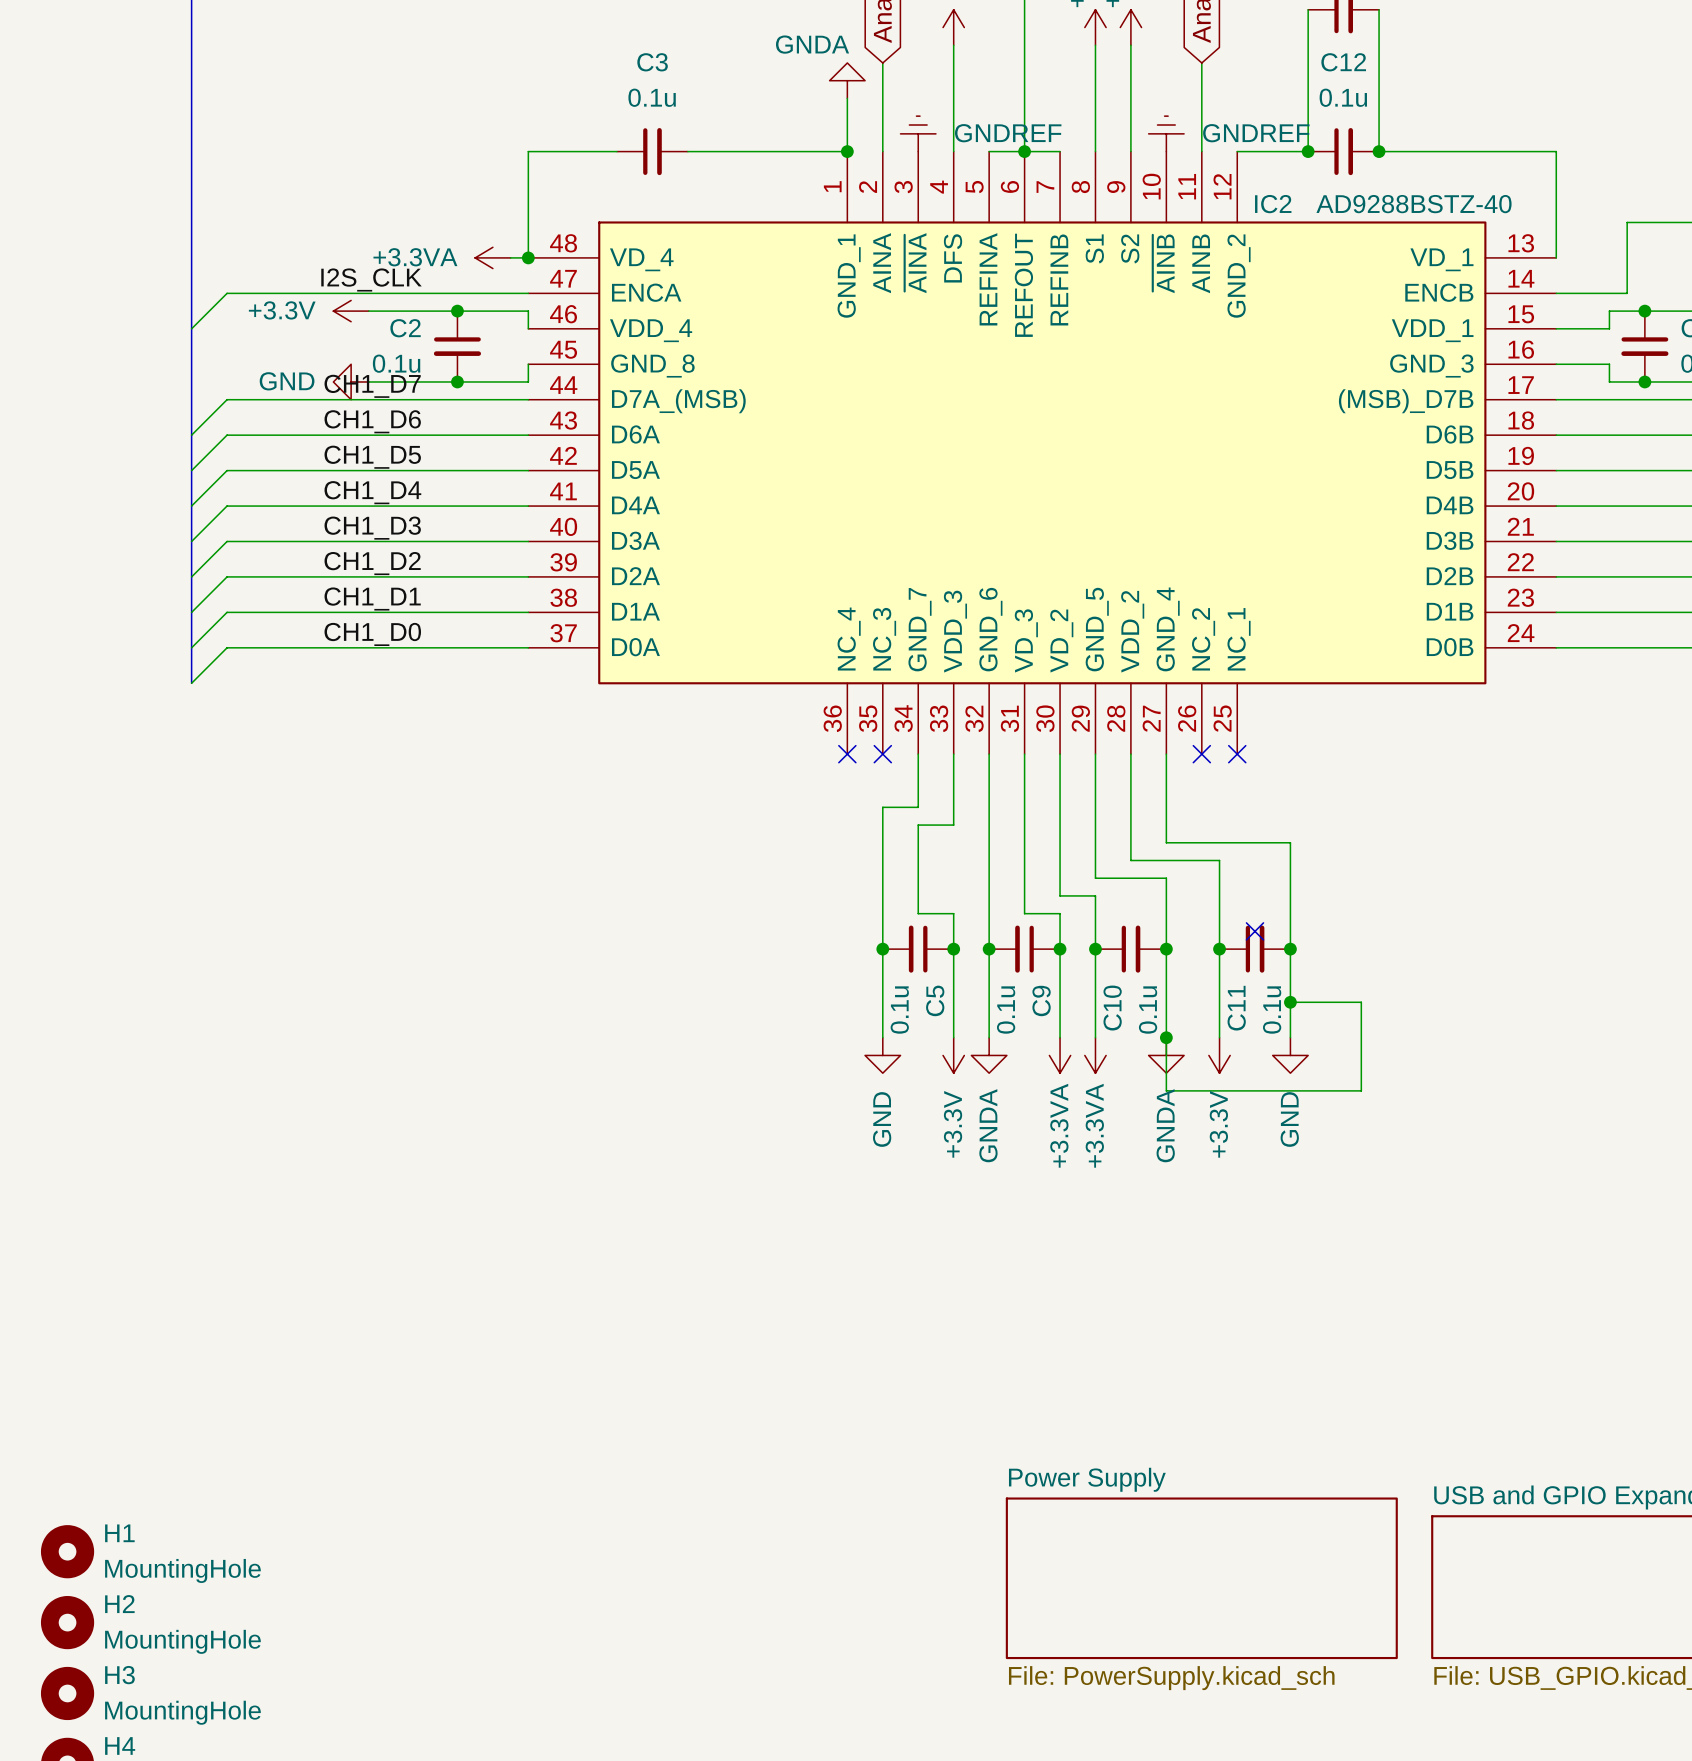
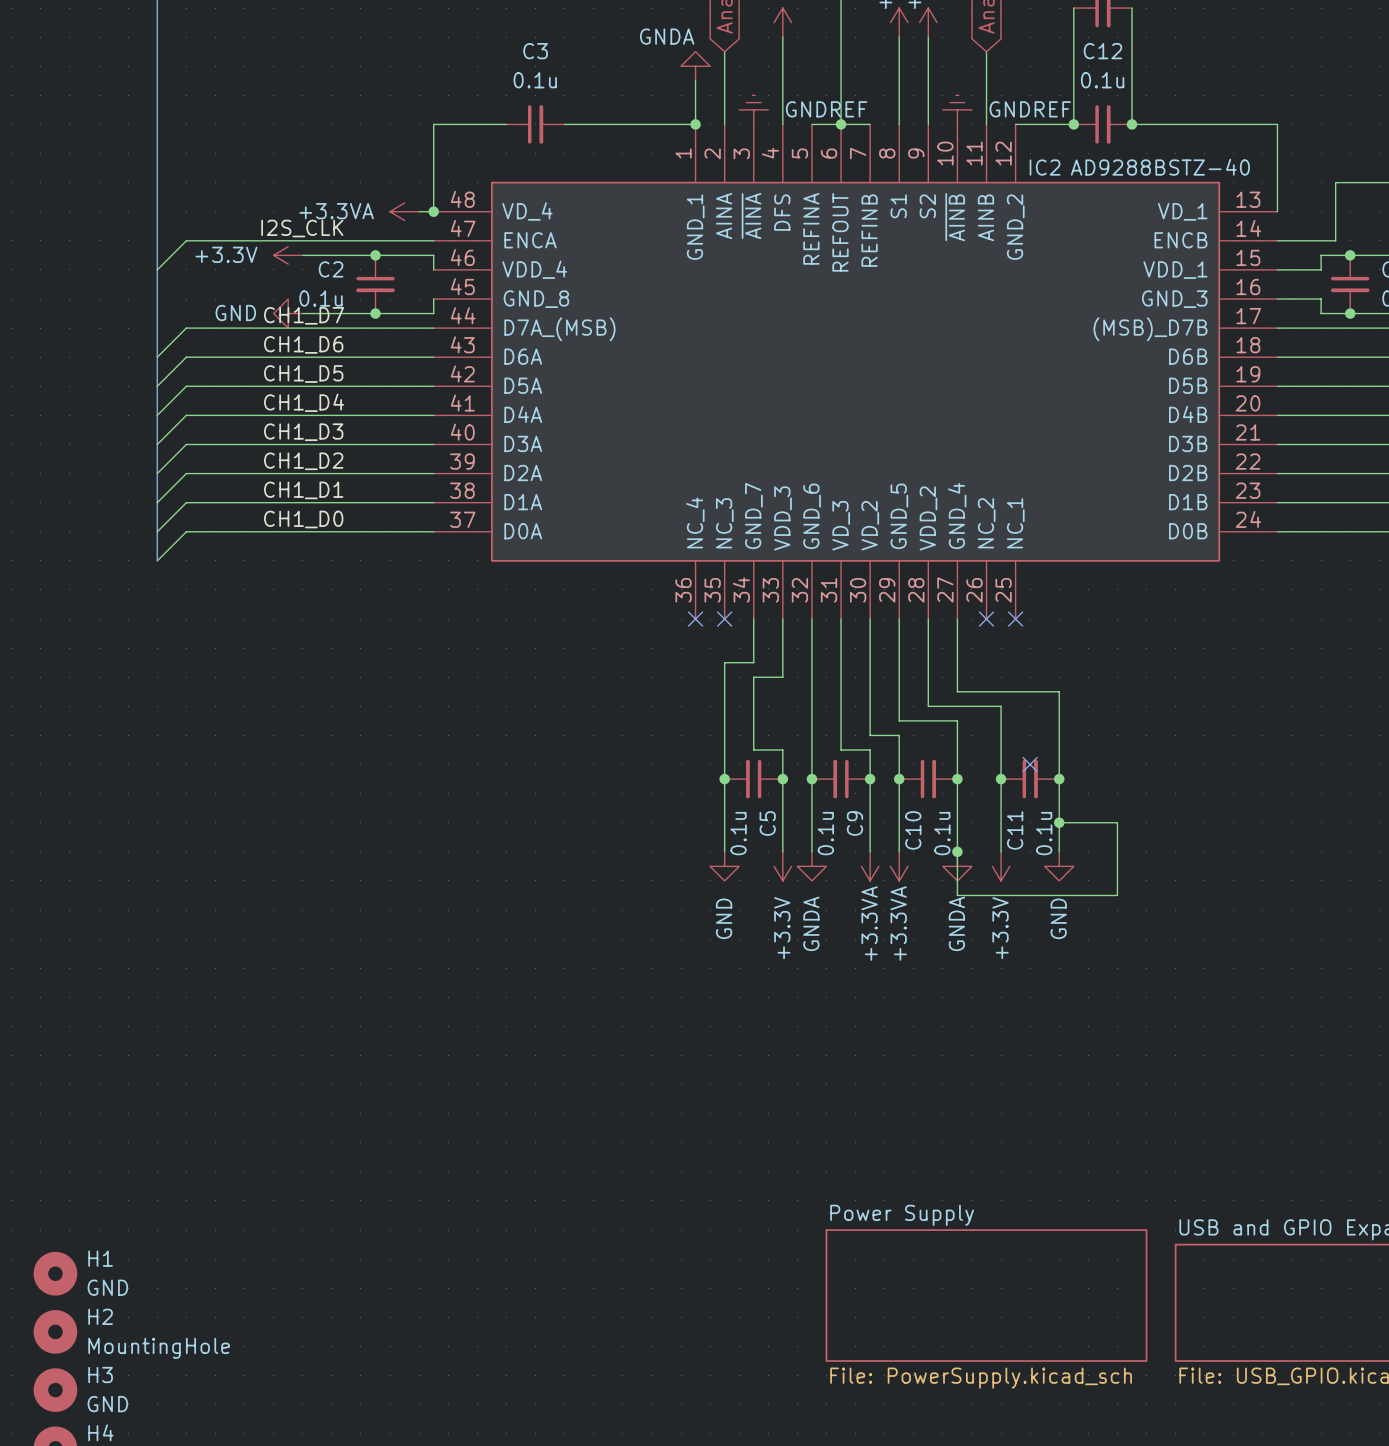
H1 value: MountingHole (182, 1570) -> GND (107, 1287)
H3 value: MountingHole (182, 1712) -> GND (107, 1404)

